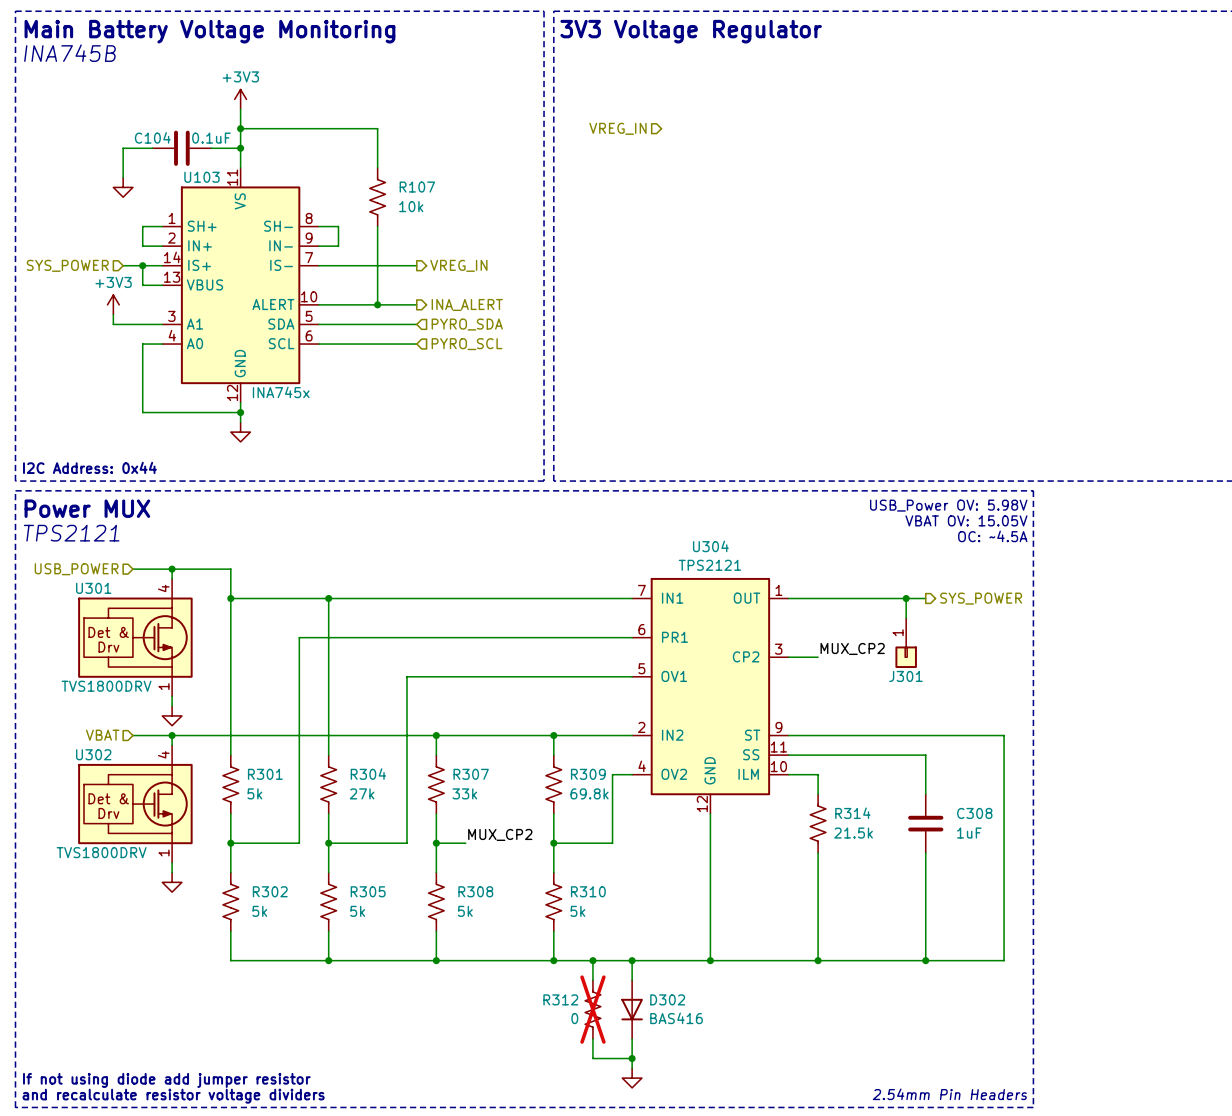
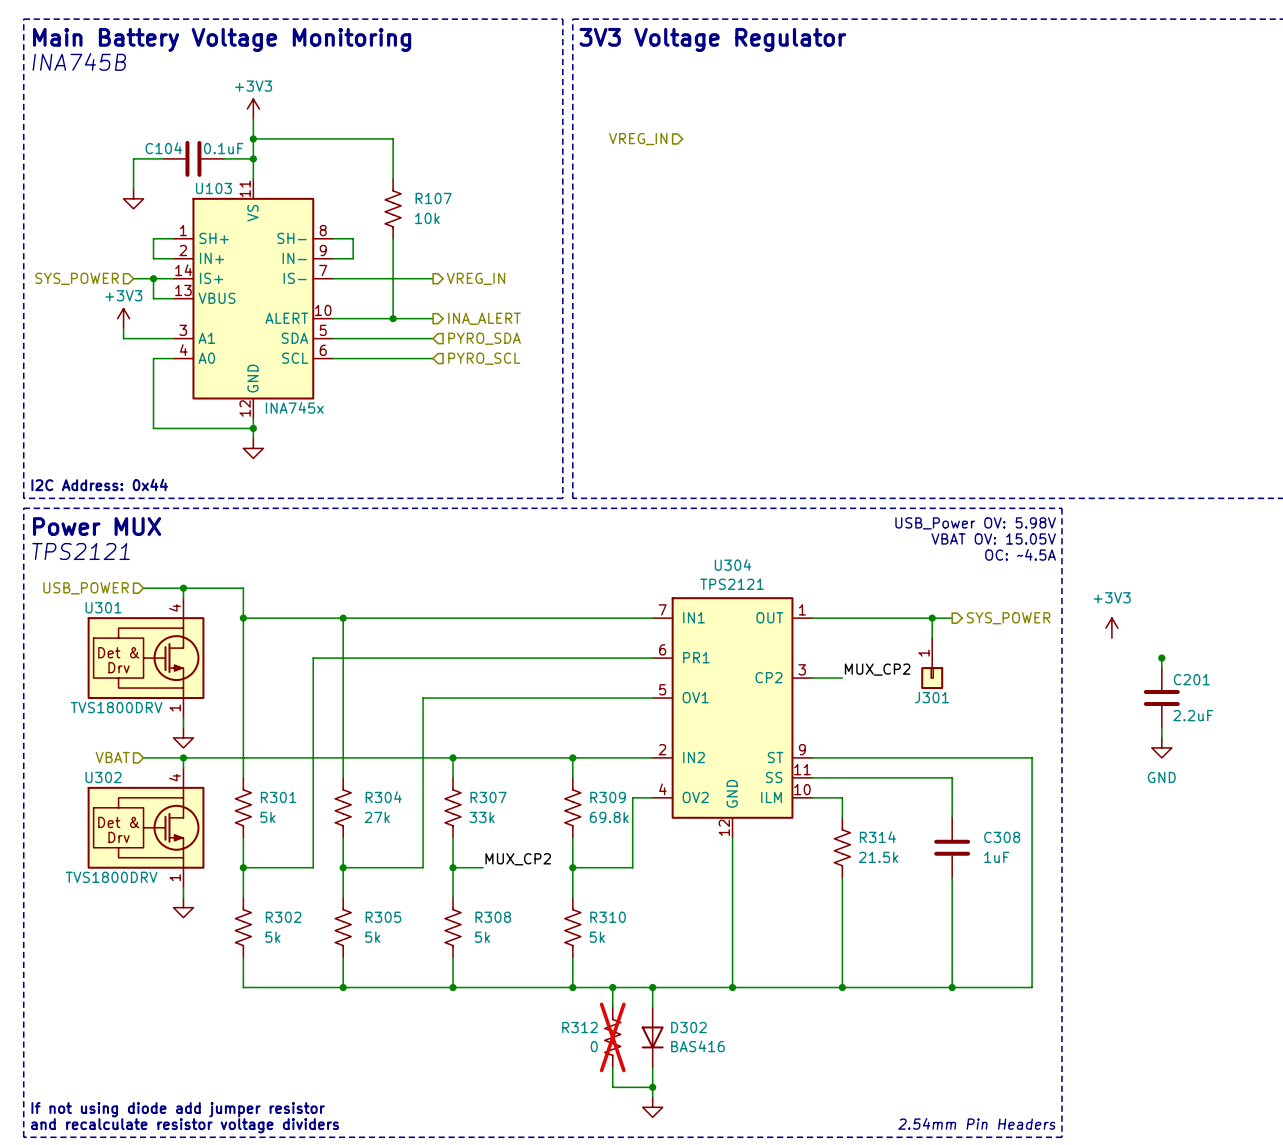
power symbol: none -> +3V3 (1111, 628)
wire: none -> (1161, 658) (1161, 668)
junction: none -> (1161, 658)
C201: none -> 2.2uF (1161, 698)
wire: none -> (1161, 727) (1161, 737)
power symbol: none -> GND (1161, 747)

